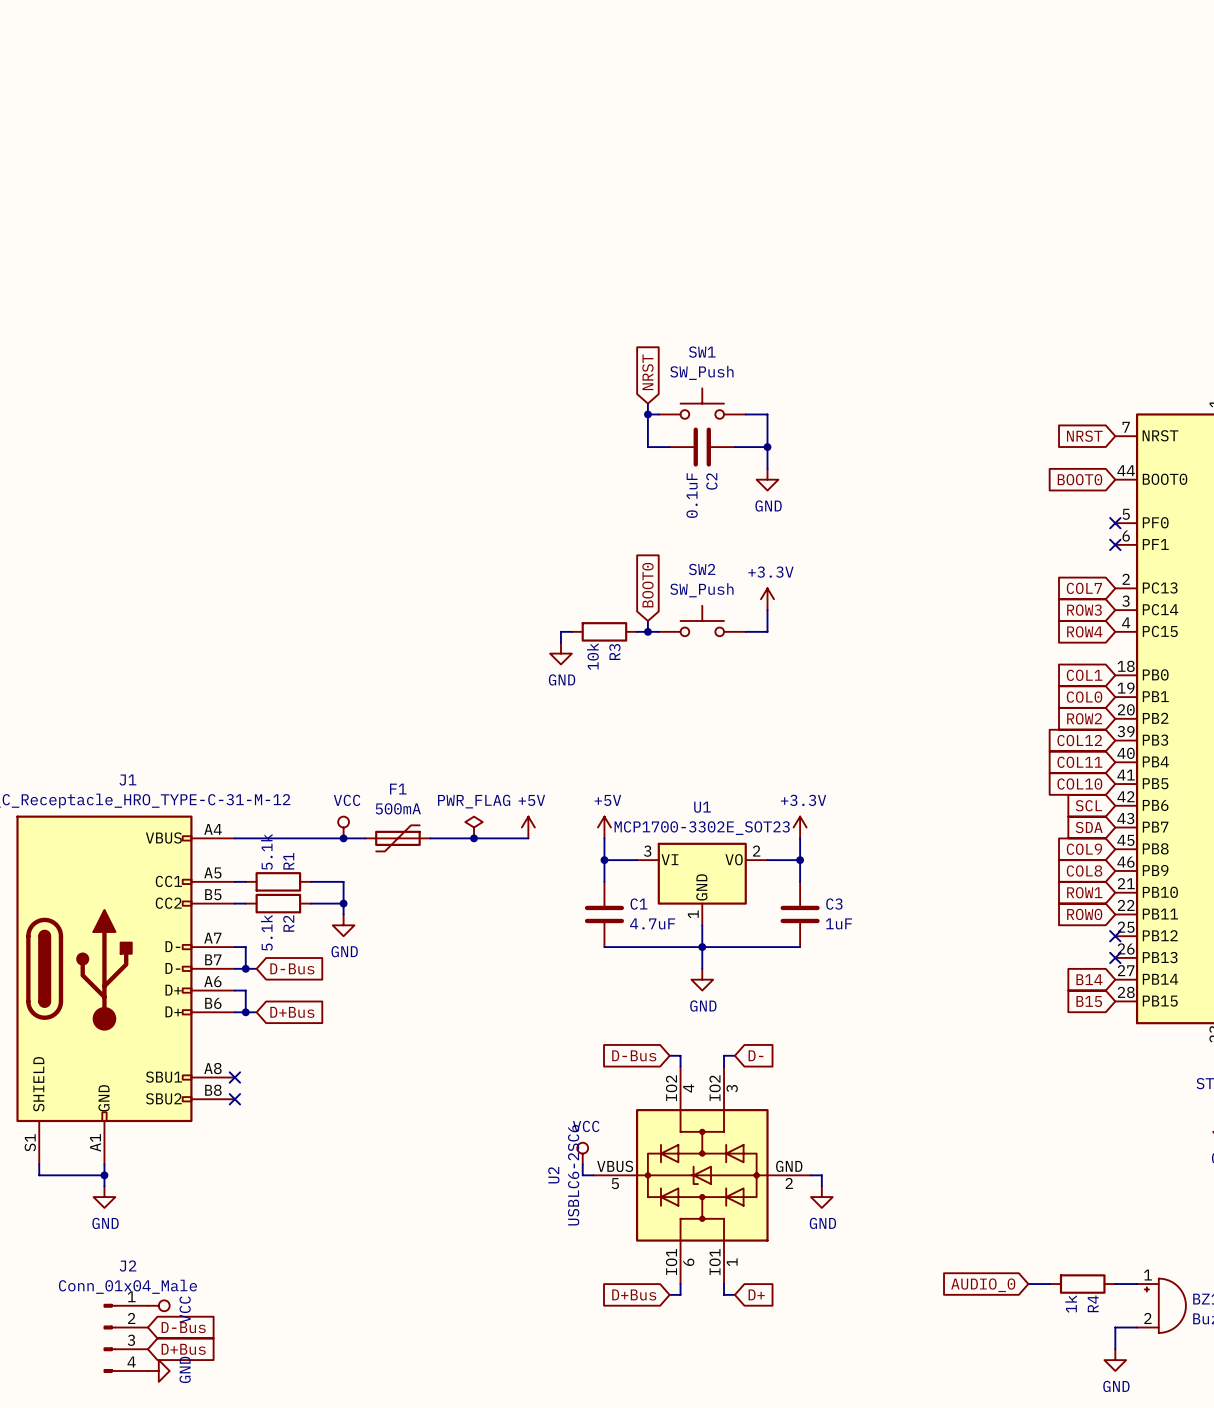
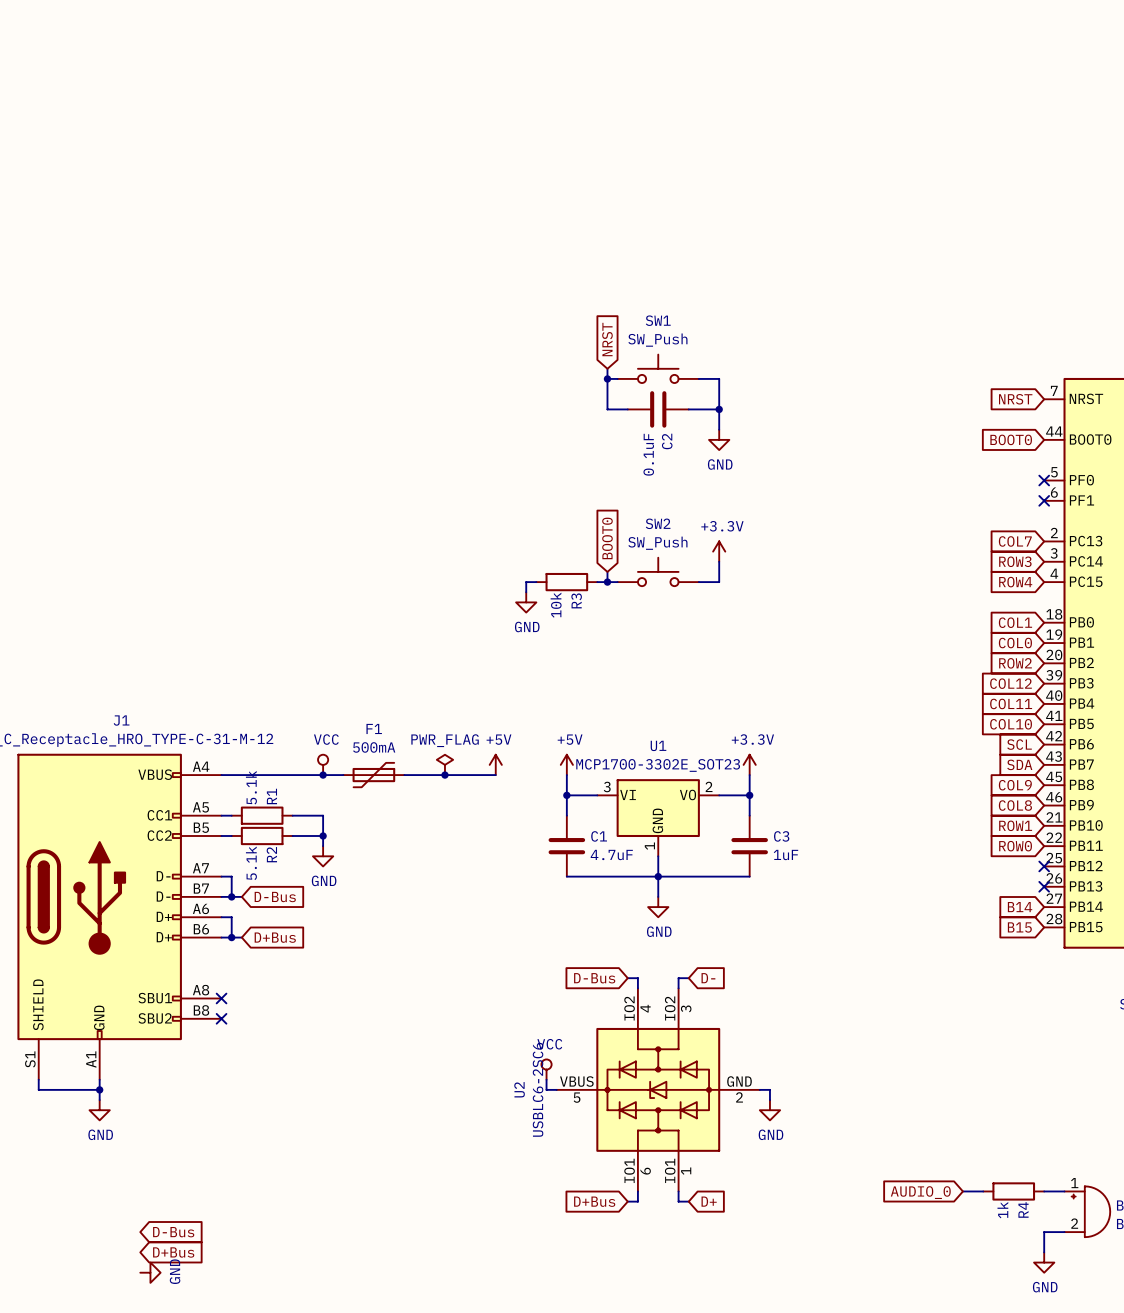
power symbol: VCC (158, 1305) -> none
J2: Conn_01x04_Male (125, 1338) -> none

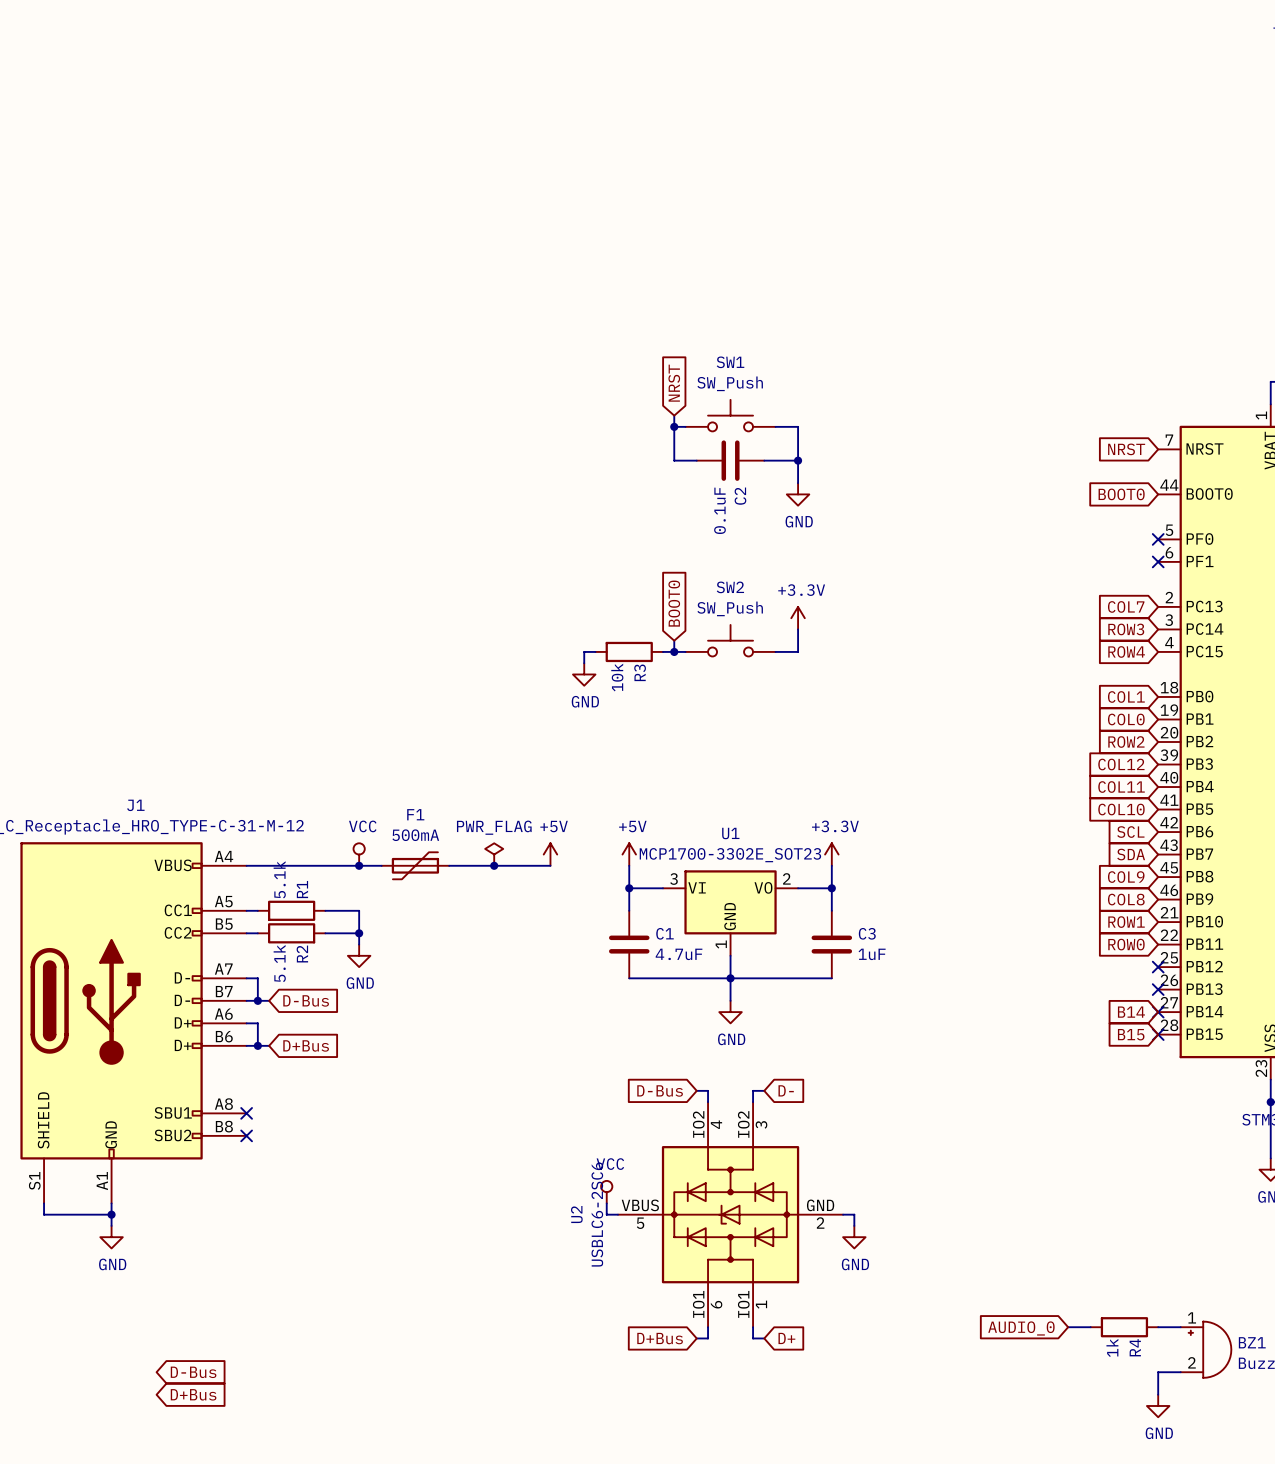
no-connect mark: none -> (1158, 1012)
no-connect mark: none -> (1158, 1034)
power symbol: GND (150, 1272) -> none

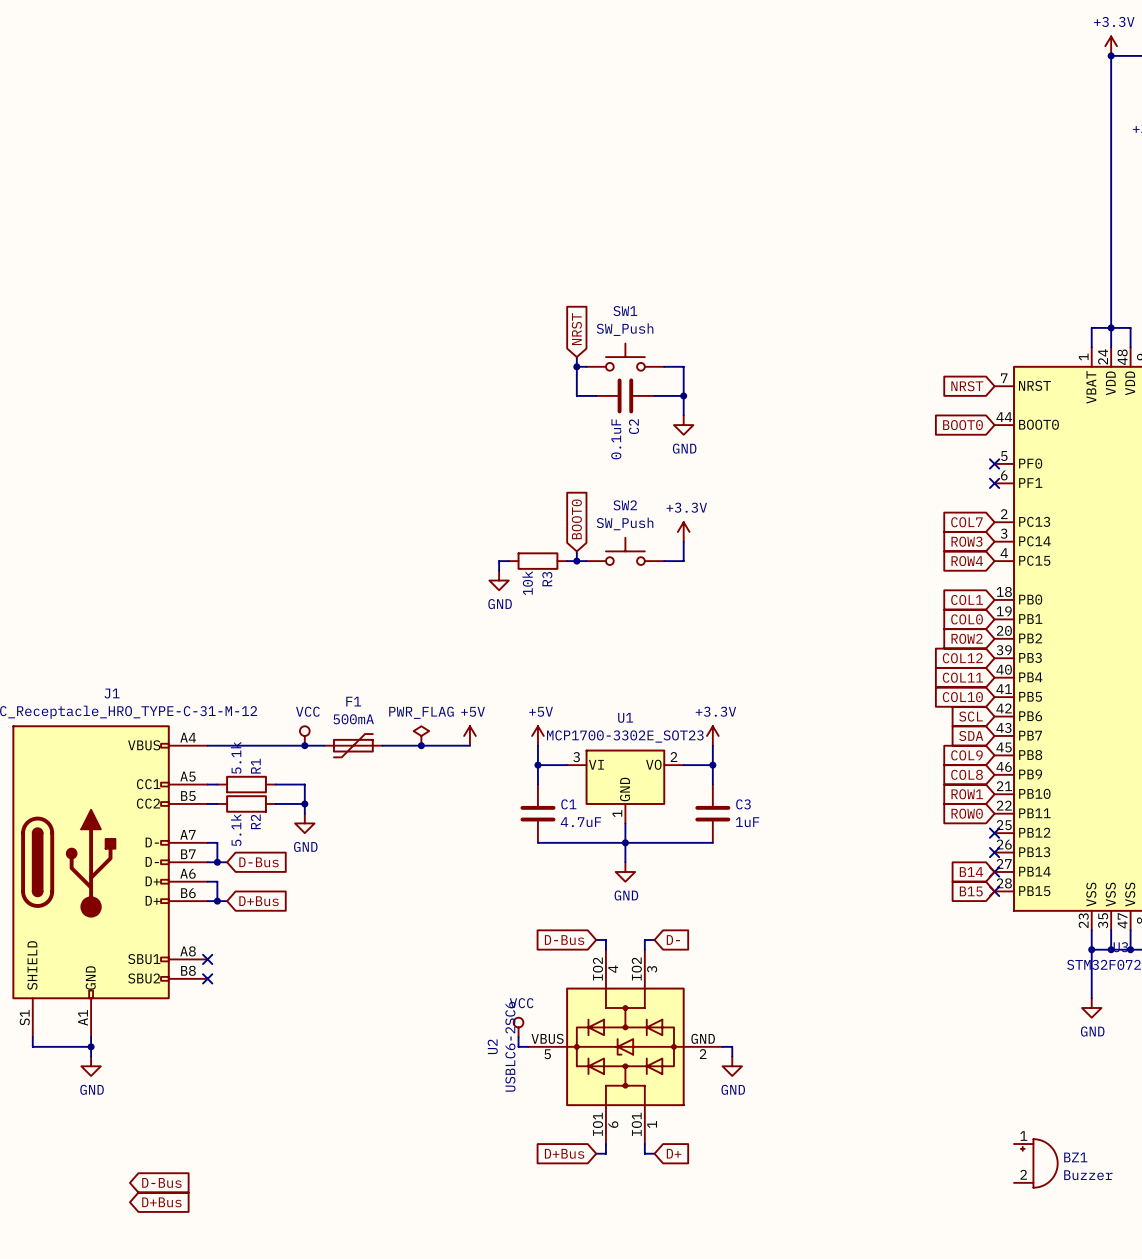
wire: (1068, 1327) (1090, 1327) -> none
R4: 1k (1124, 1327) -> none
wire: (1158, 1327) (1180, 1327) -> none
global label: AUDIO_0 (1021, 1328) -> none
wire: (1180, 1372) (1158, 1372) (1158, 1394) -> none
power symbol: GND (1158, 1405) -> none

